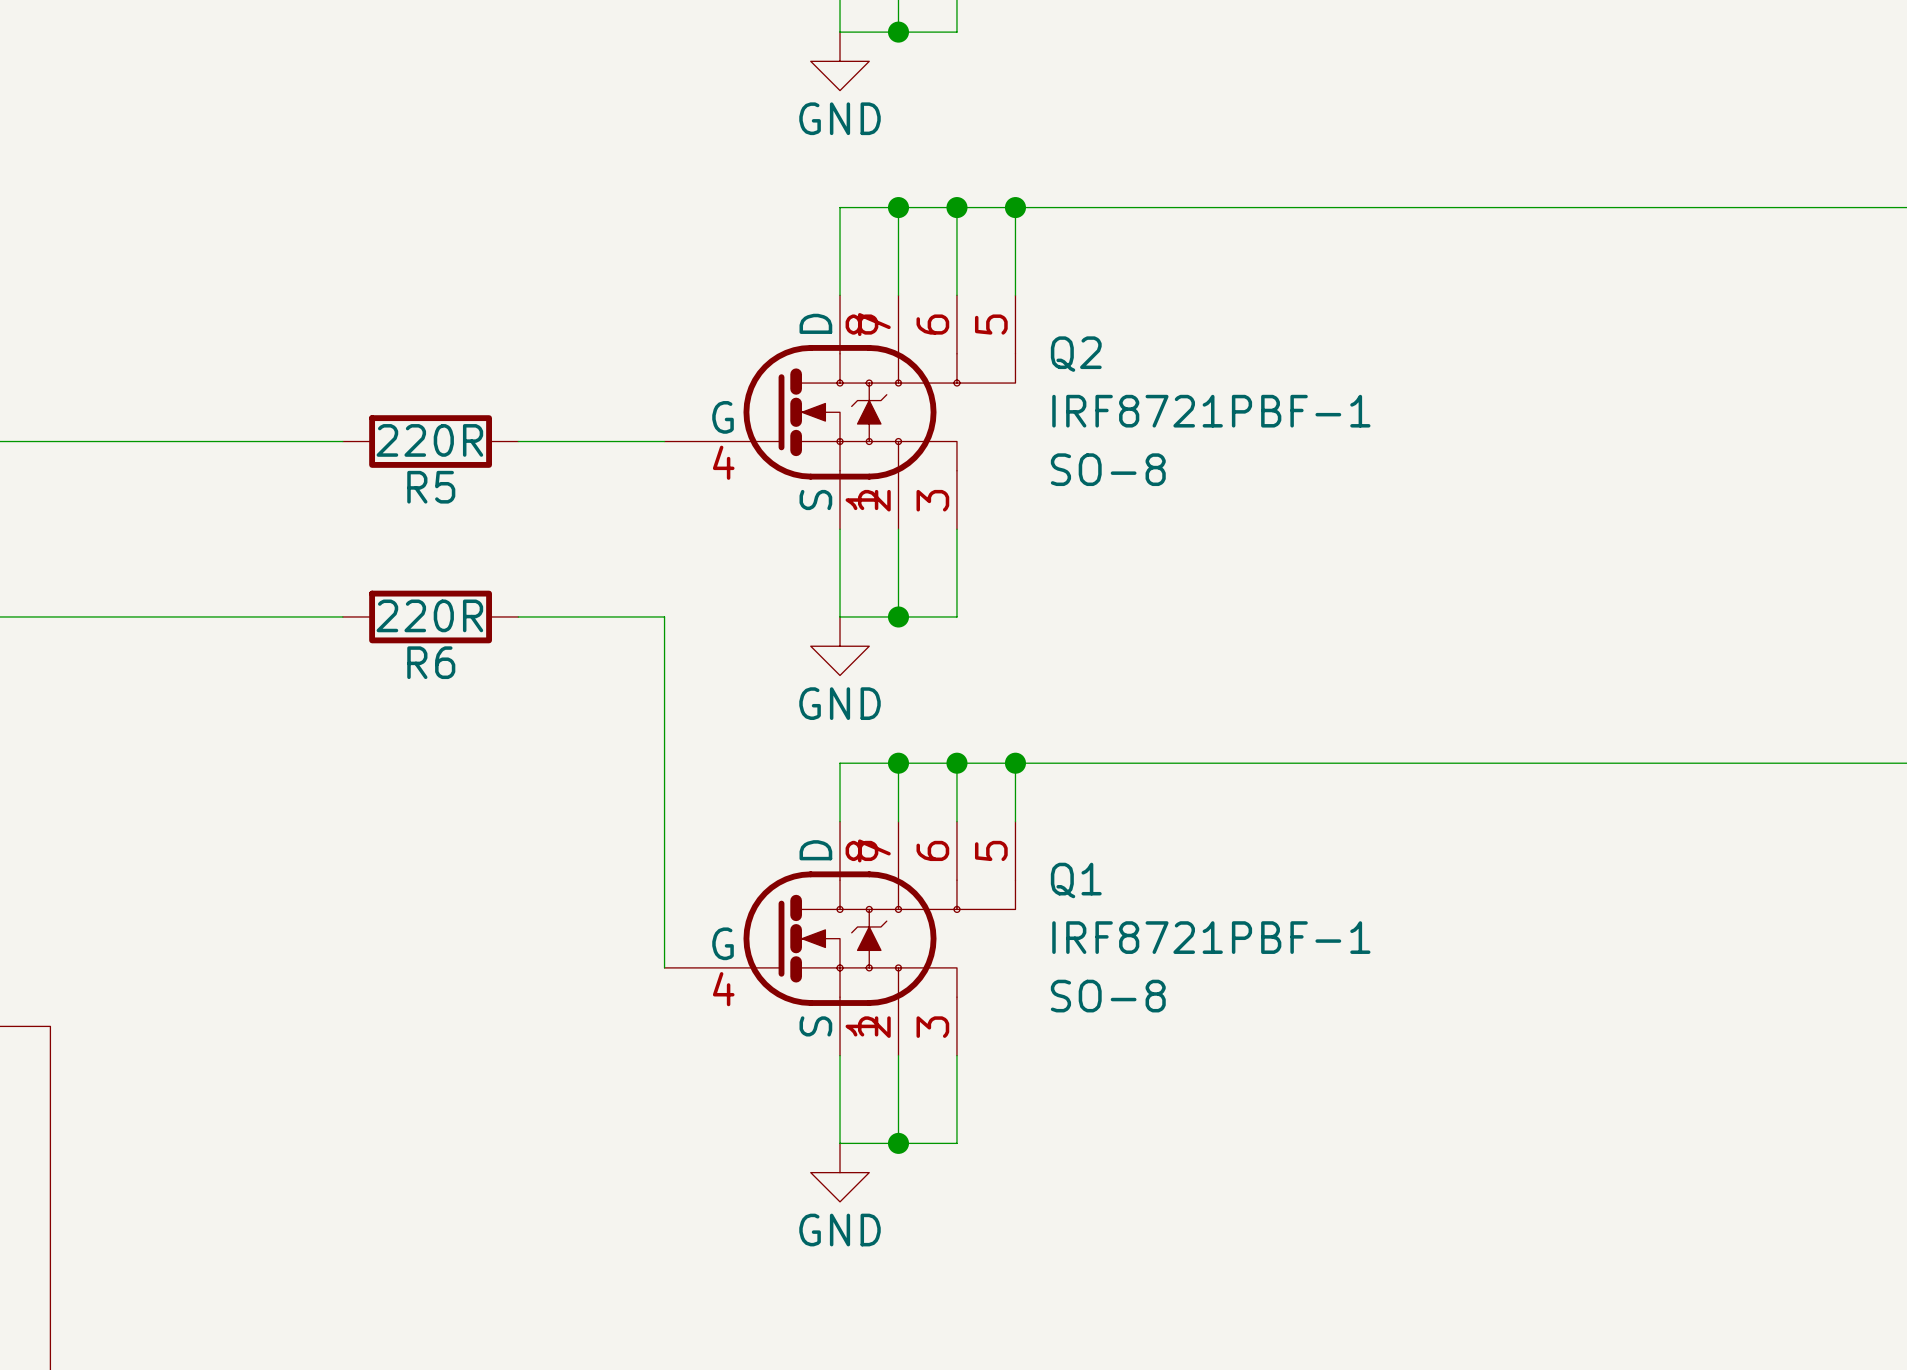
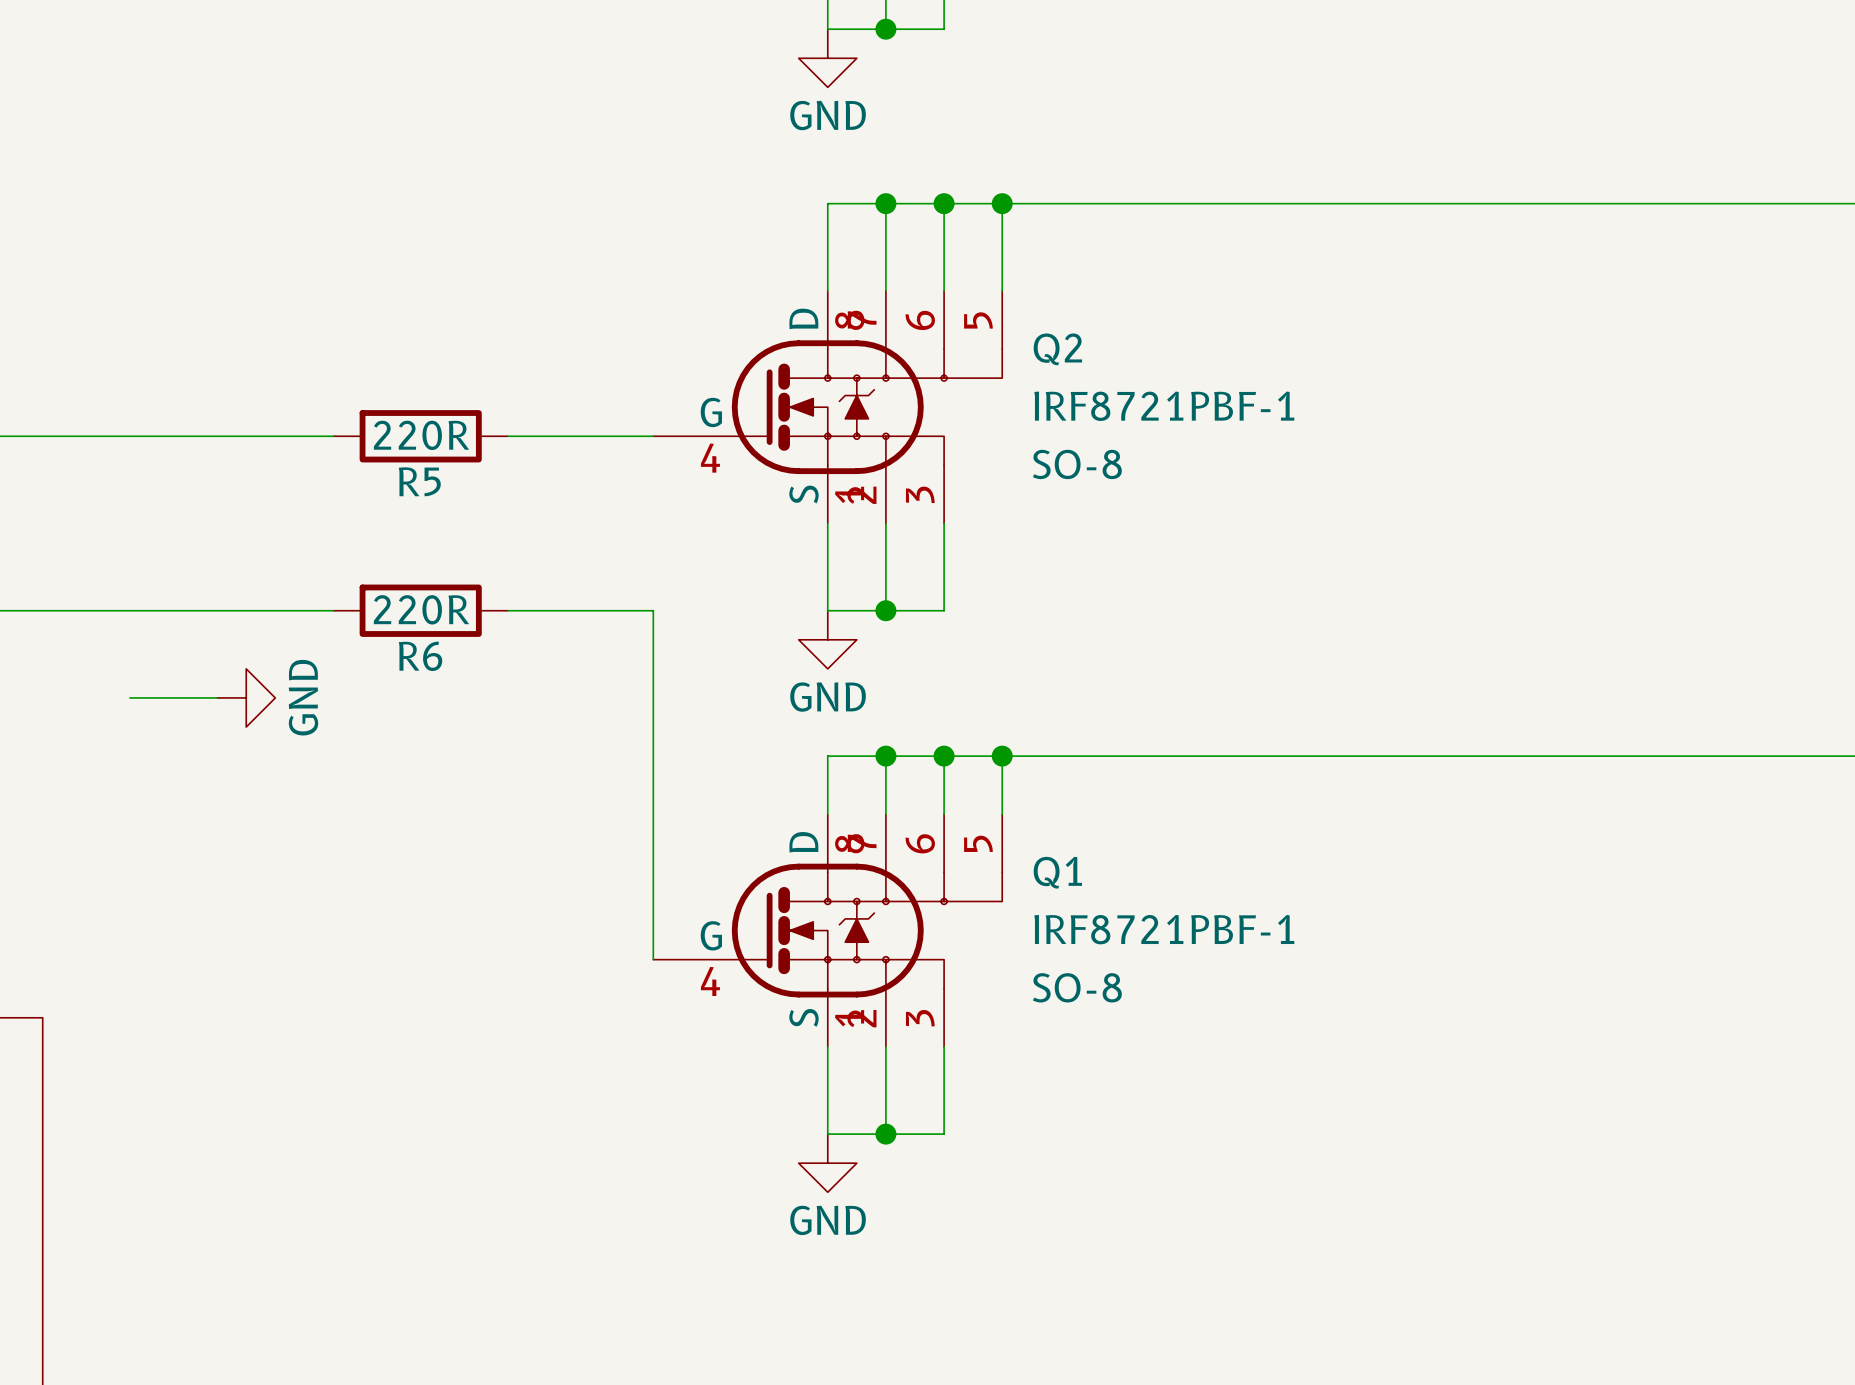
wire: none -> (129, 697) (217, 697)
power symbol: none -> GND (246, 697)

